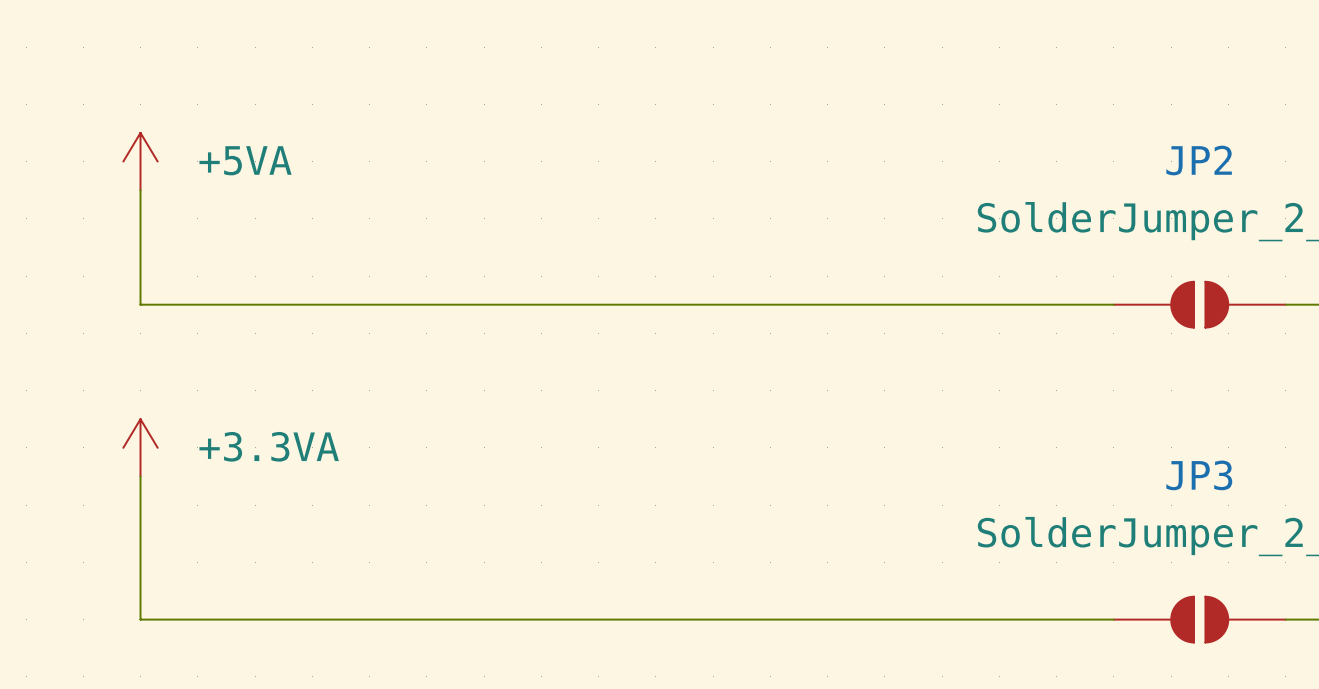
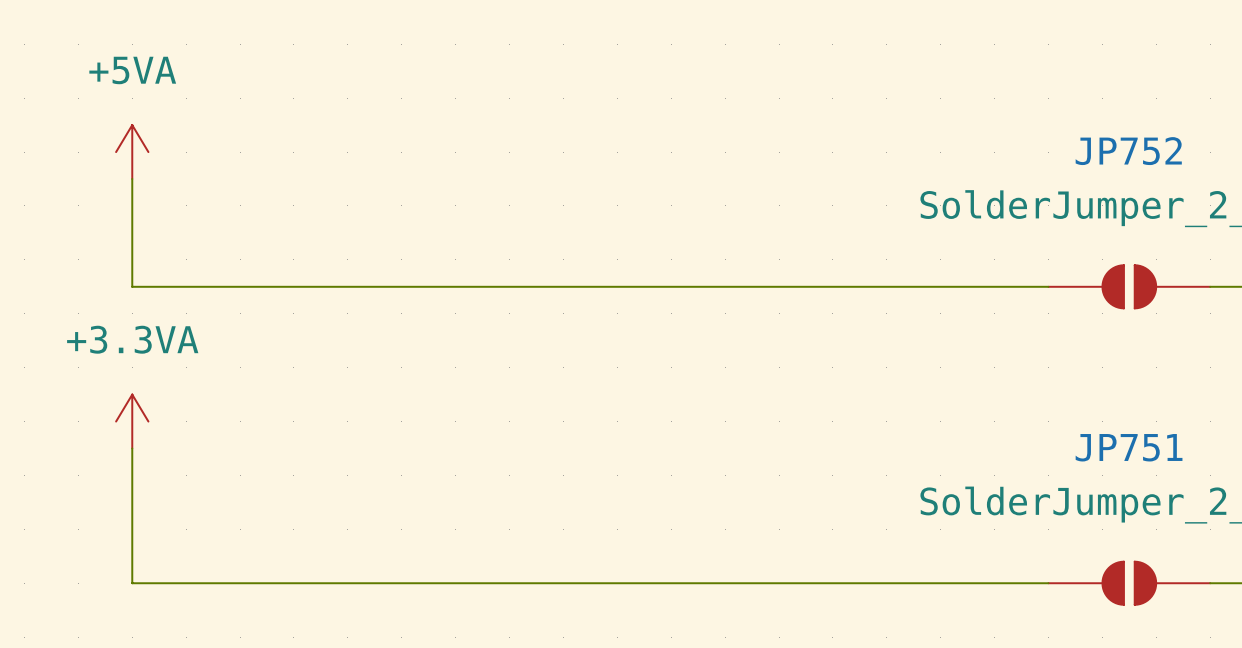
power symbol text position: +5VA (245, 160) -> +5VA (132, 70)
JP2 name: JP2 (1199, 160) -> JP752 (1128, 151)
power symbol text position: +3.3VA (269, 446) -> +3.3VA (132, 339)
JP3 name: JP3 (1199, 475) -> JP751 (1129, 447)

